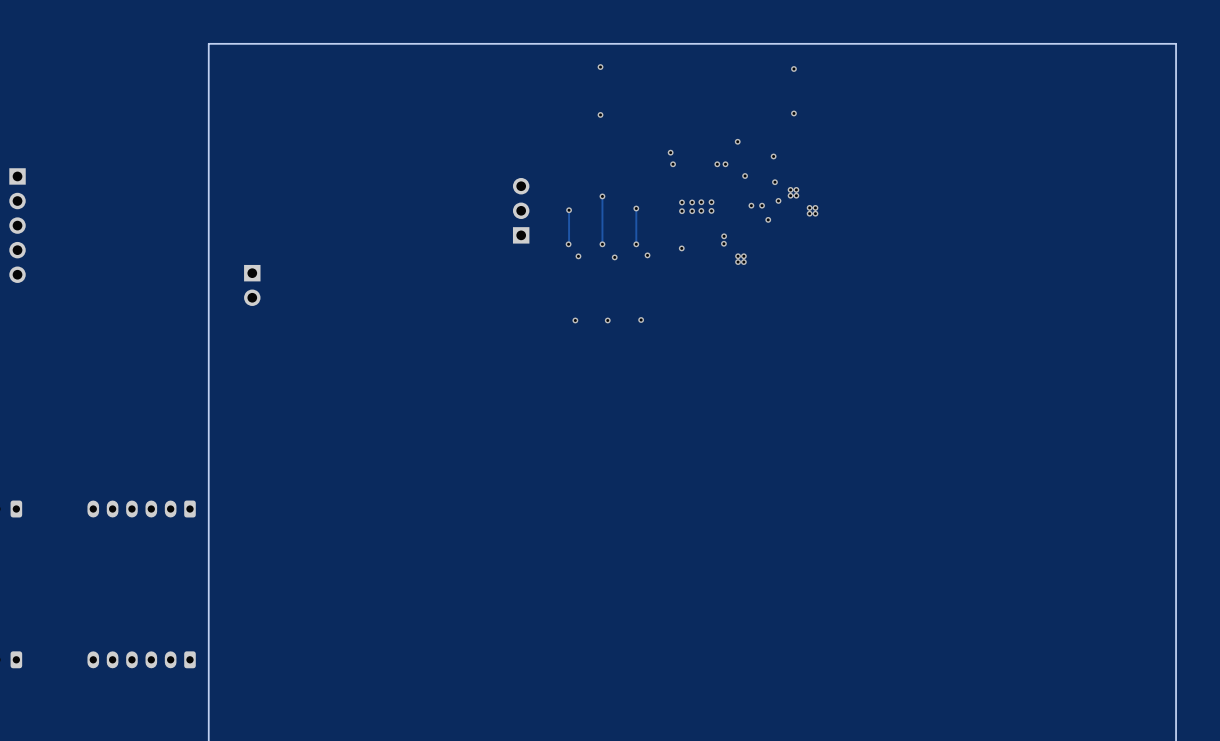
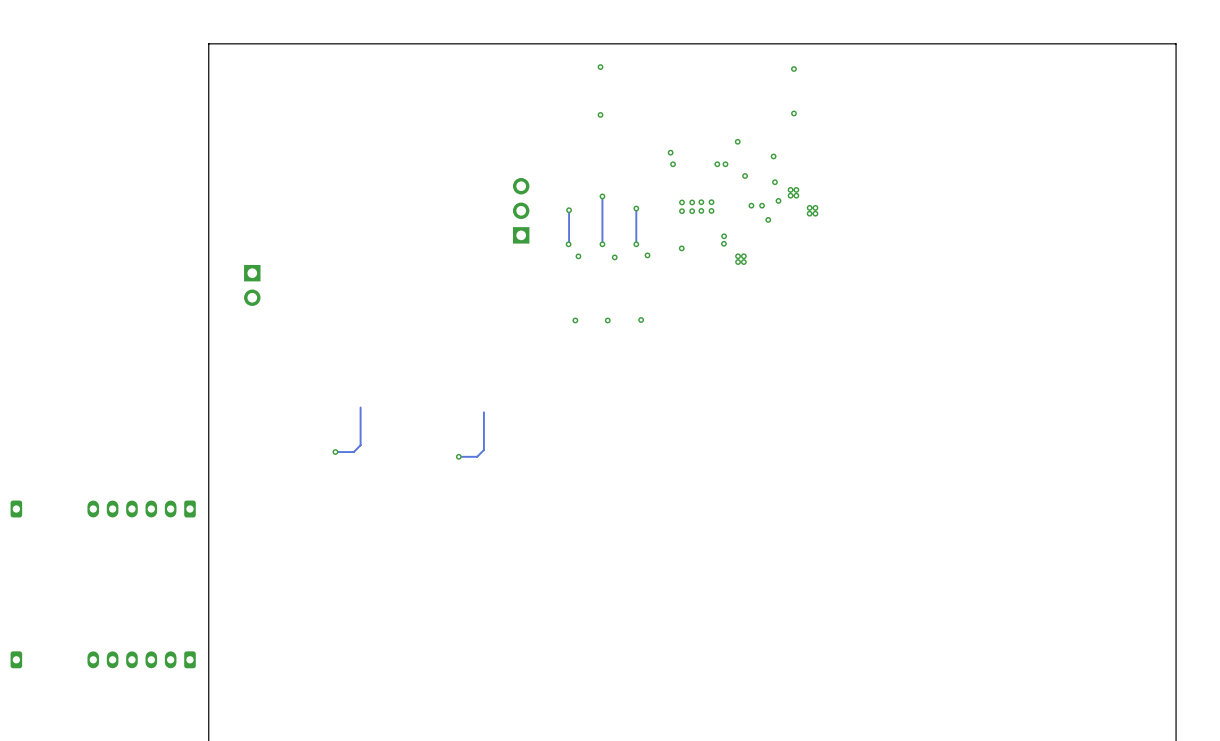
part: (17, 225) -> none
track: none -> (360, 407) (360, 445) (353, 452) (335, 452)
track: none -> (483, 412) (483, 450) (477, 456) (458, 456)
via: none -> (335, 452)
via: none -> (458, 456)

